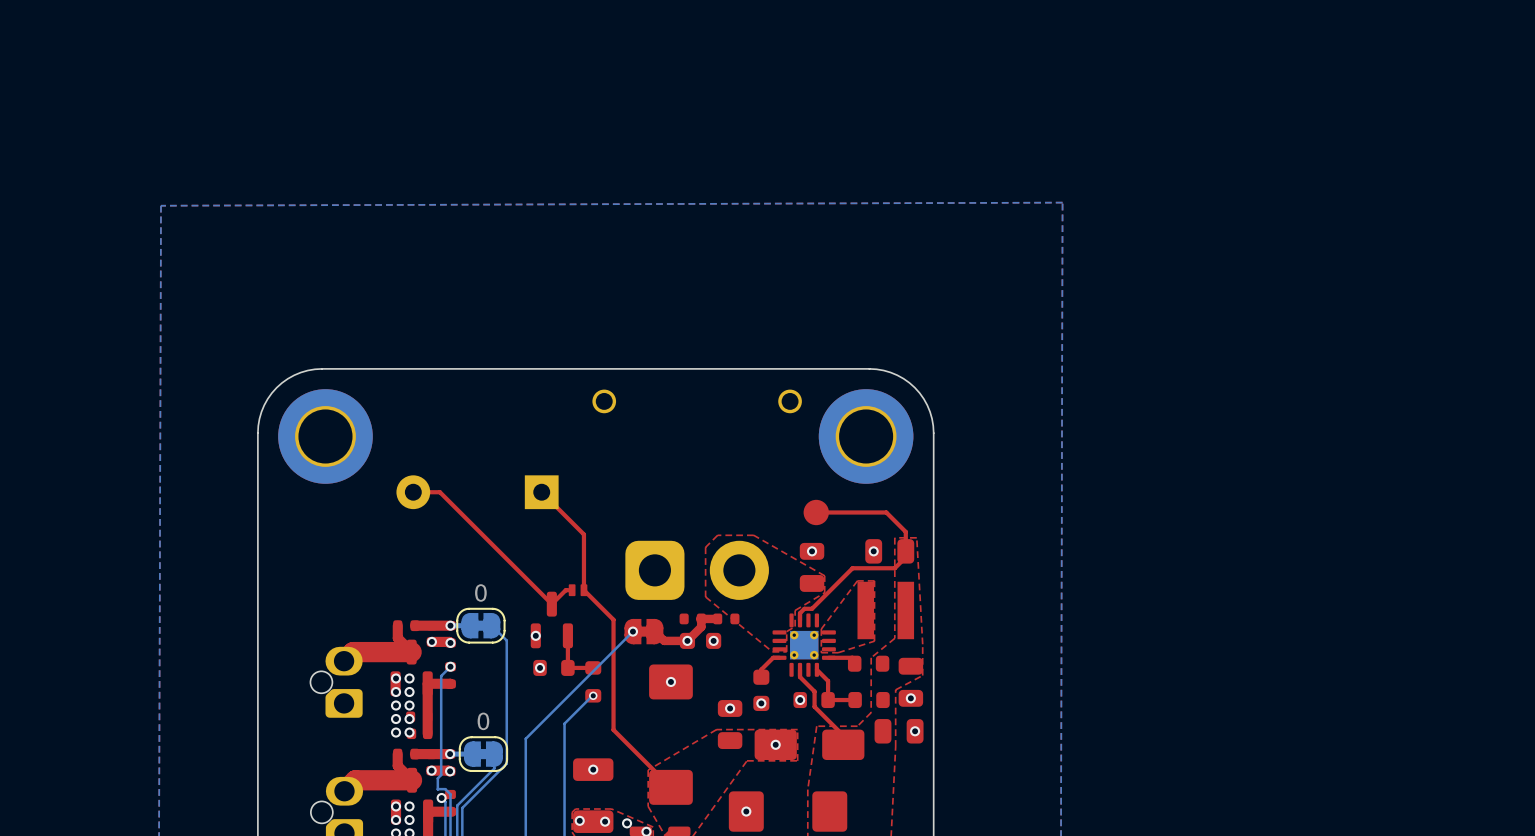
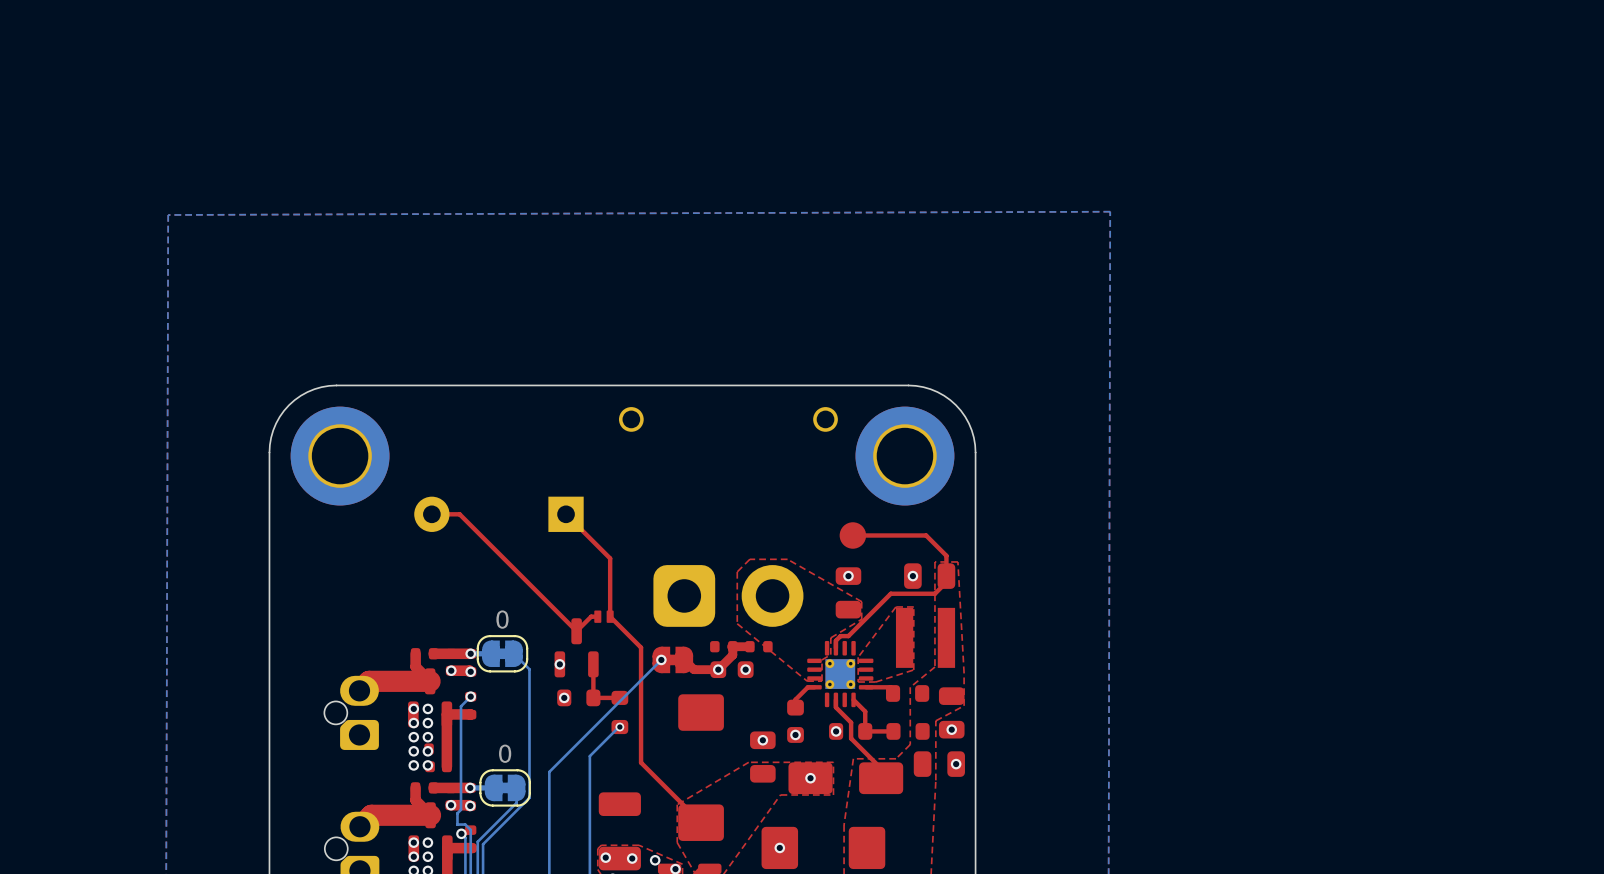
via: (670, 681) -> none
via: (593, 769) -> none

